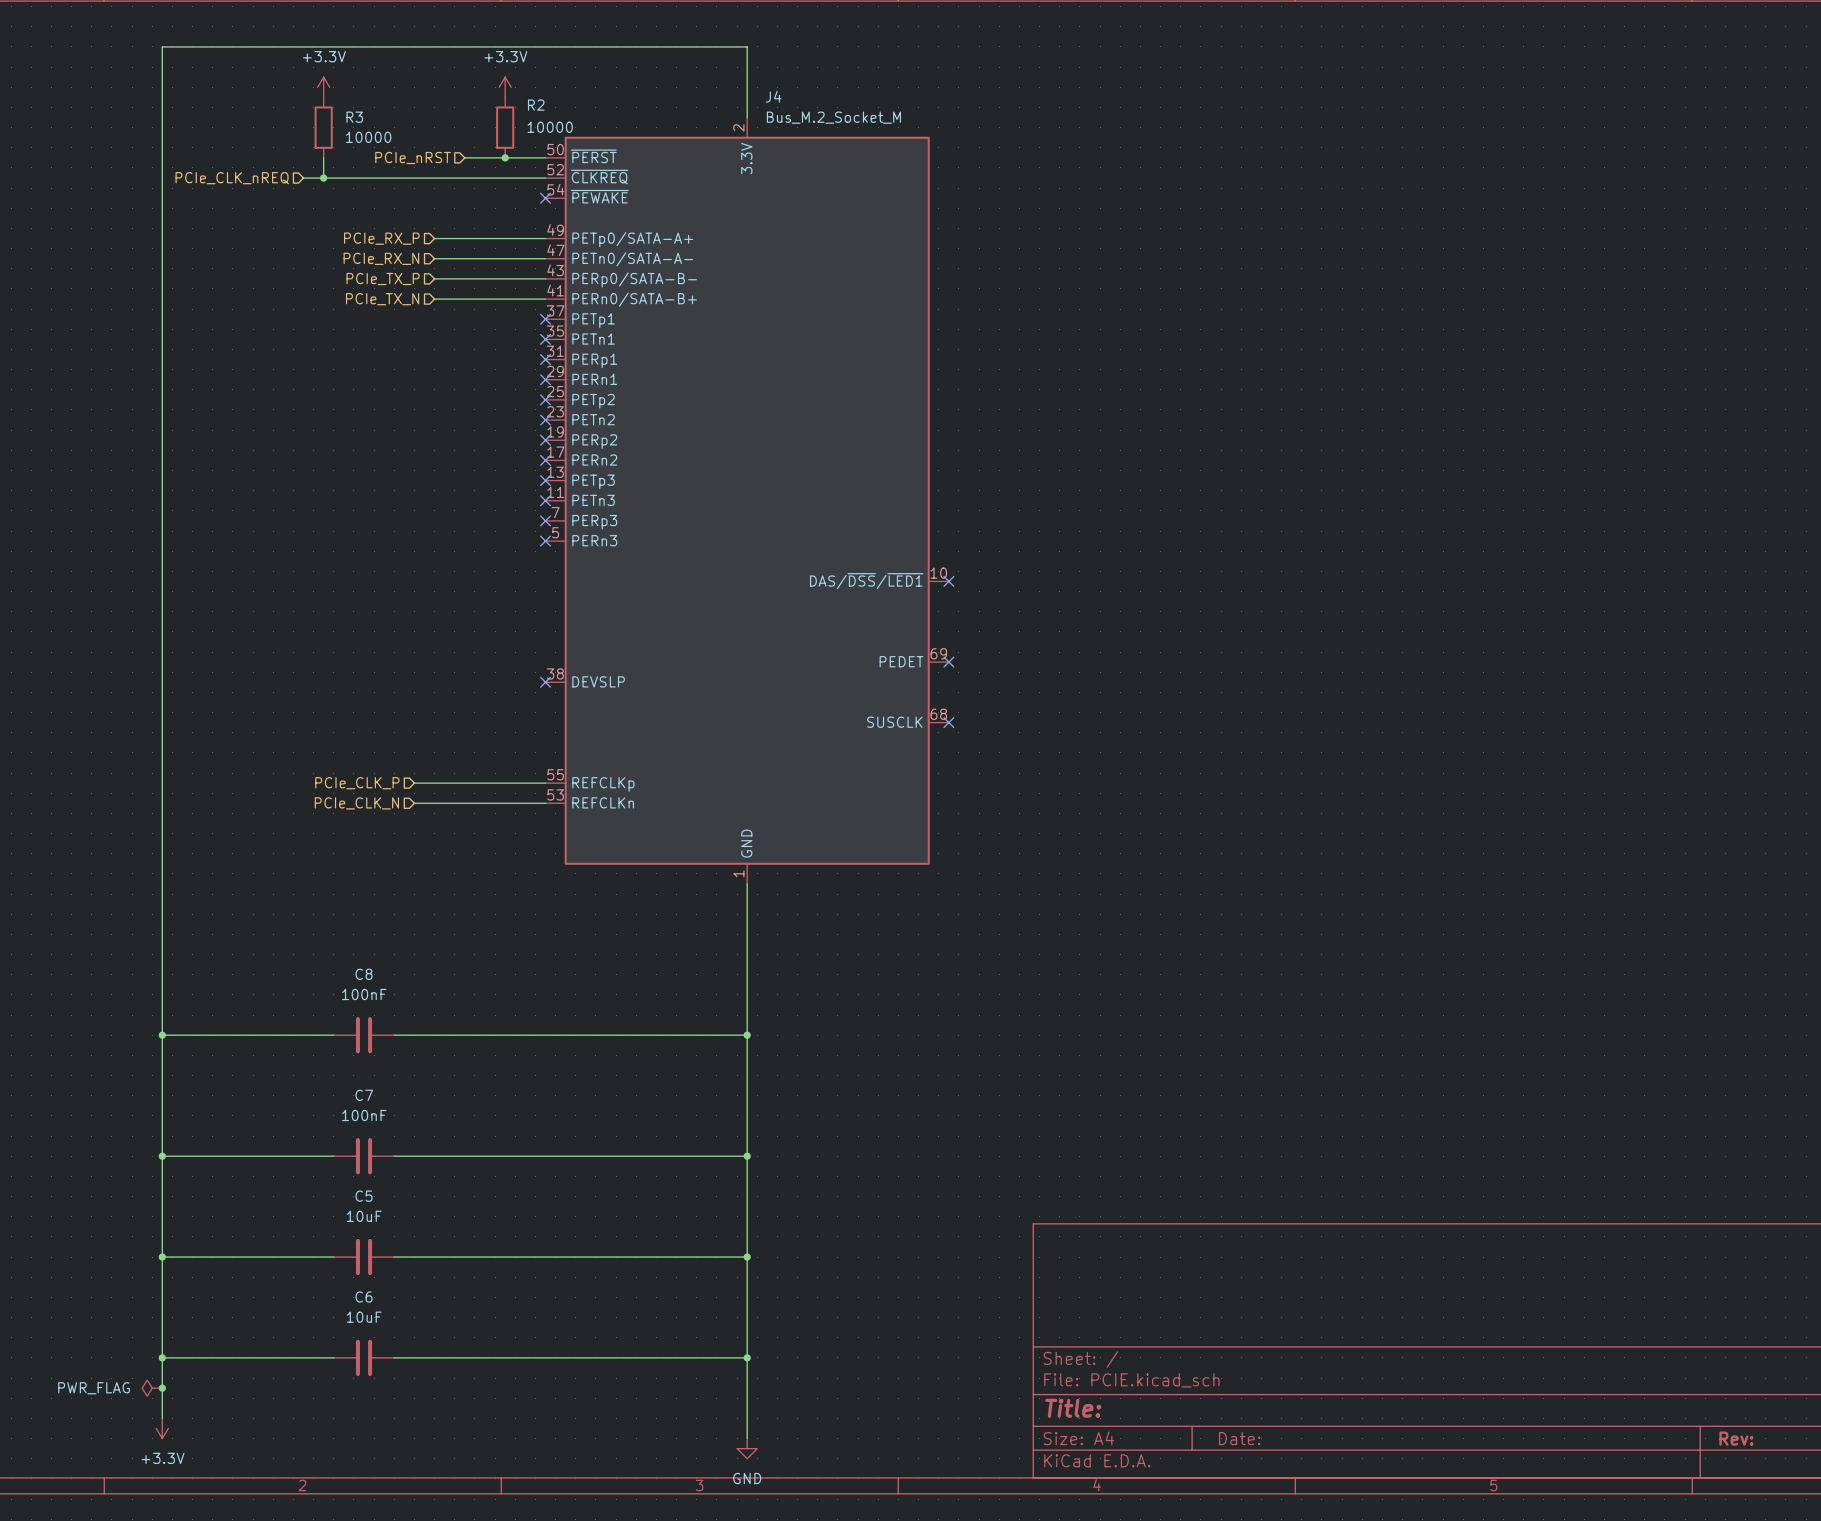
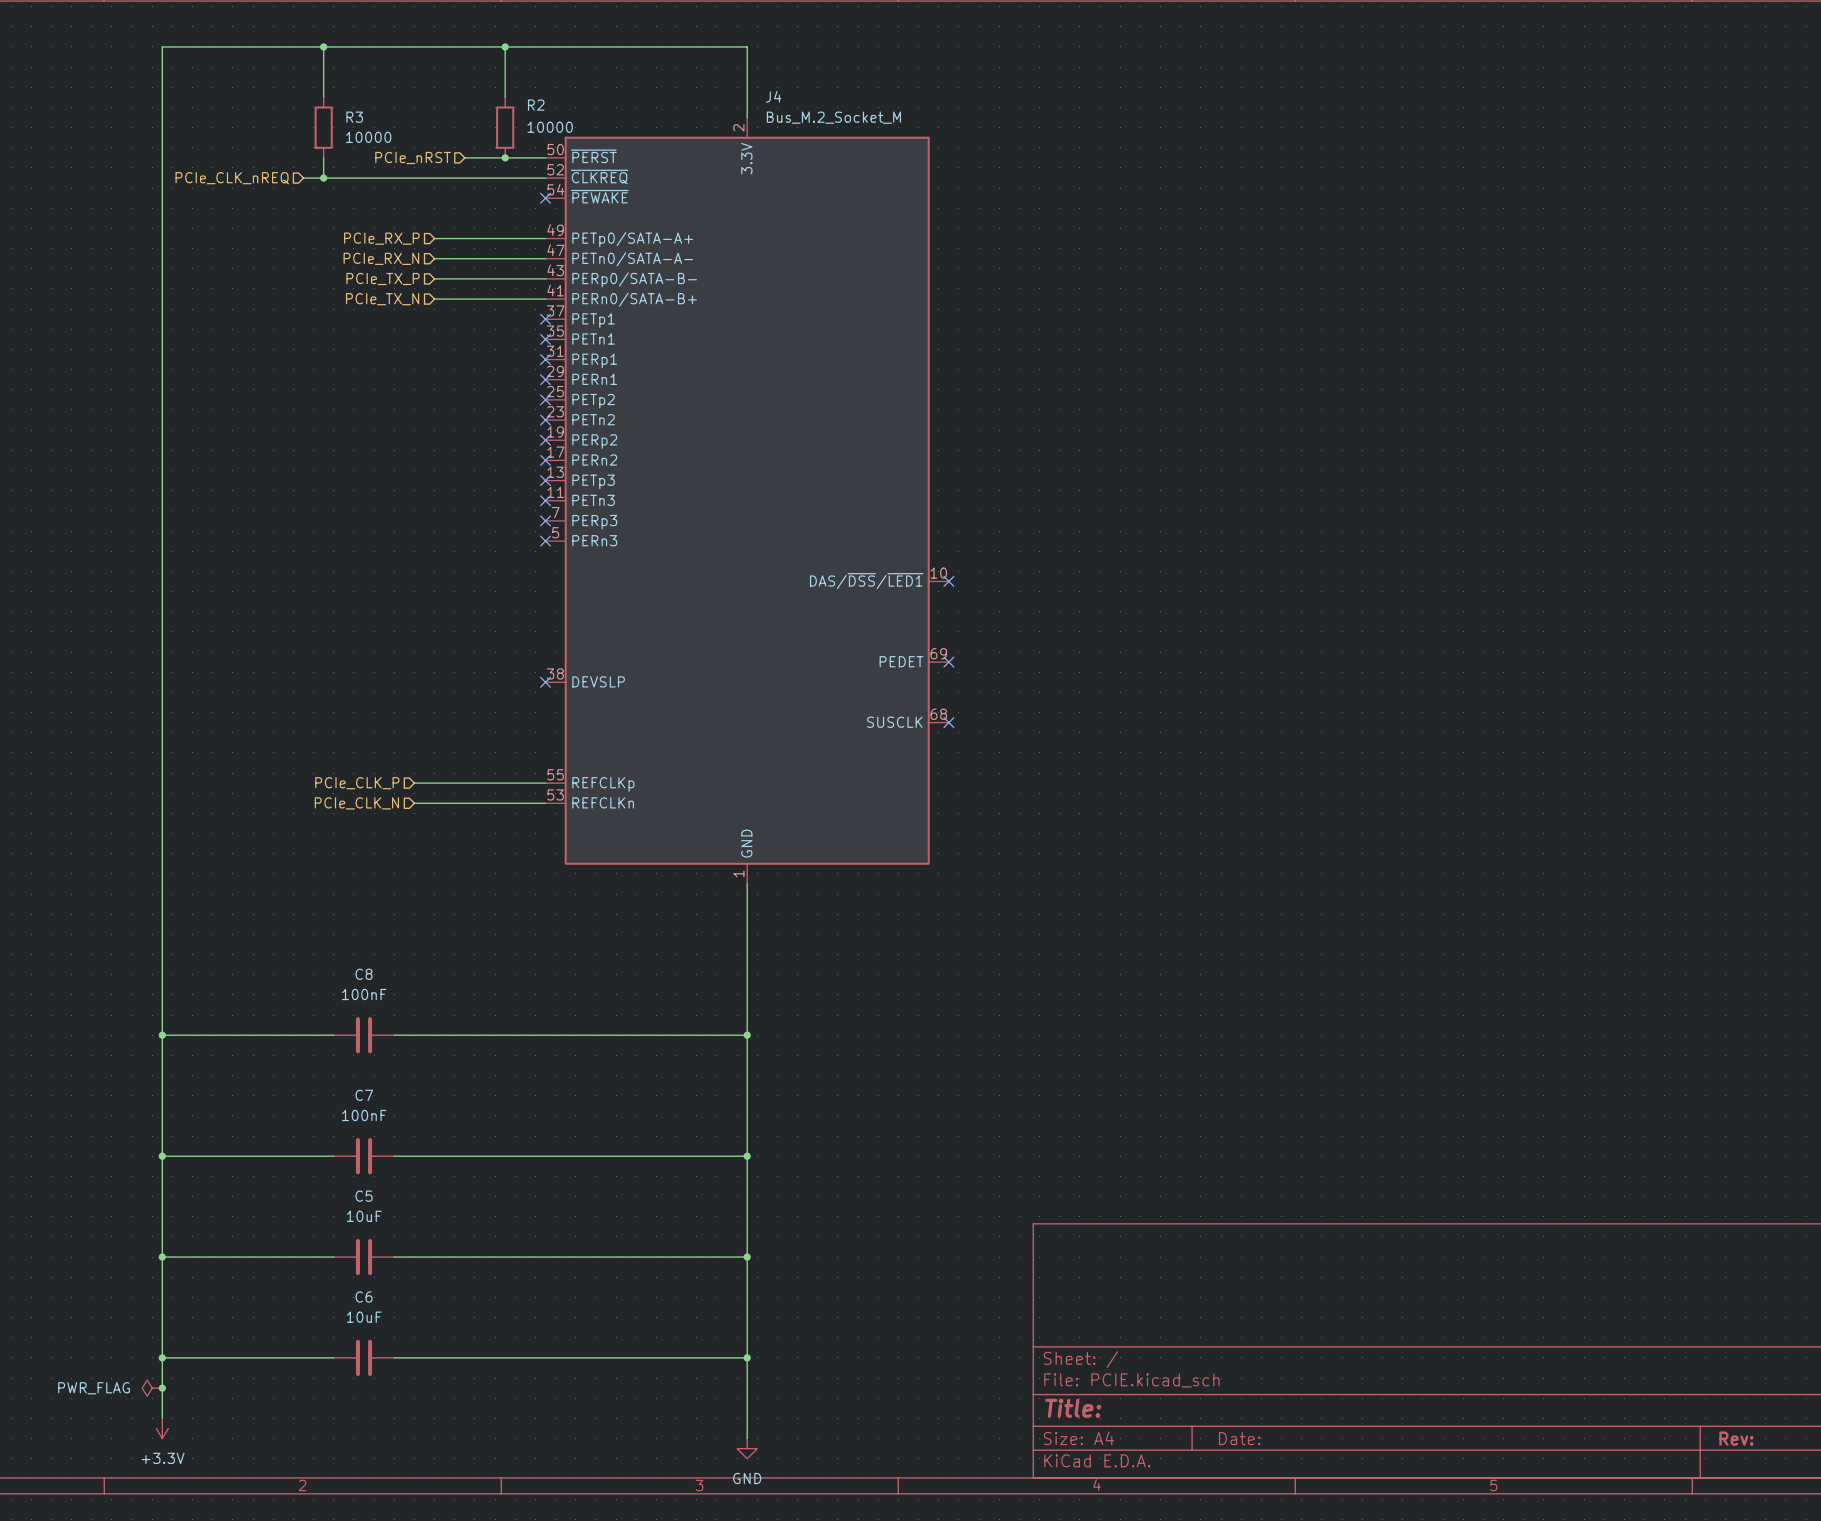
wire: none -> (323, 46) (323, 97)
junction: none -> (323, 46)
wire: none -> (505, 46) (505, 97)
junction: none -> (505, 46)
power symbol: +3.3V (323, 87) -> none
power symbol: +3.3V (505, 87) -> none

